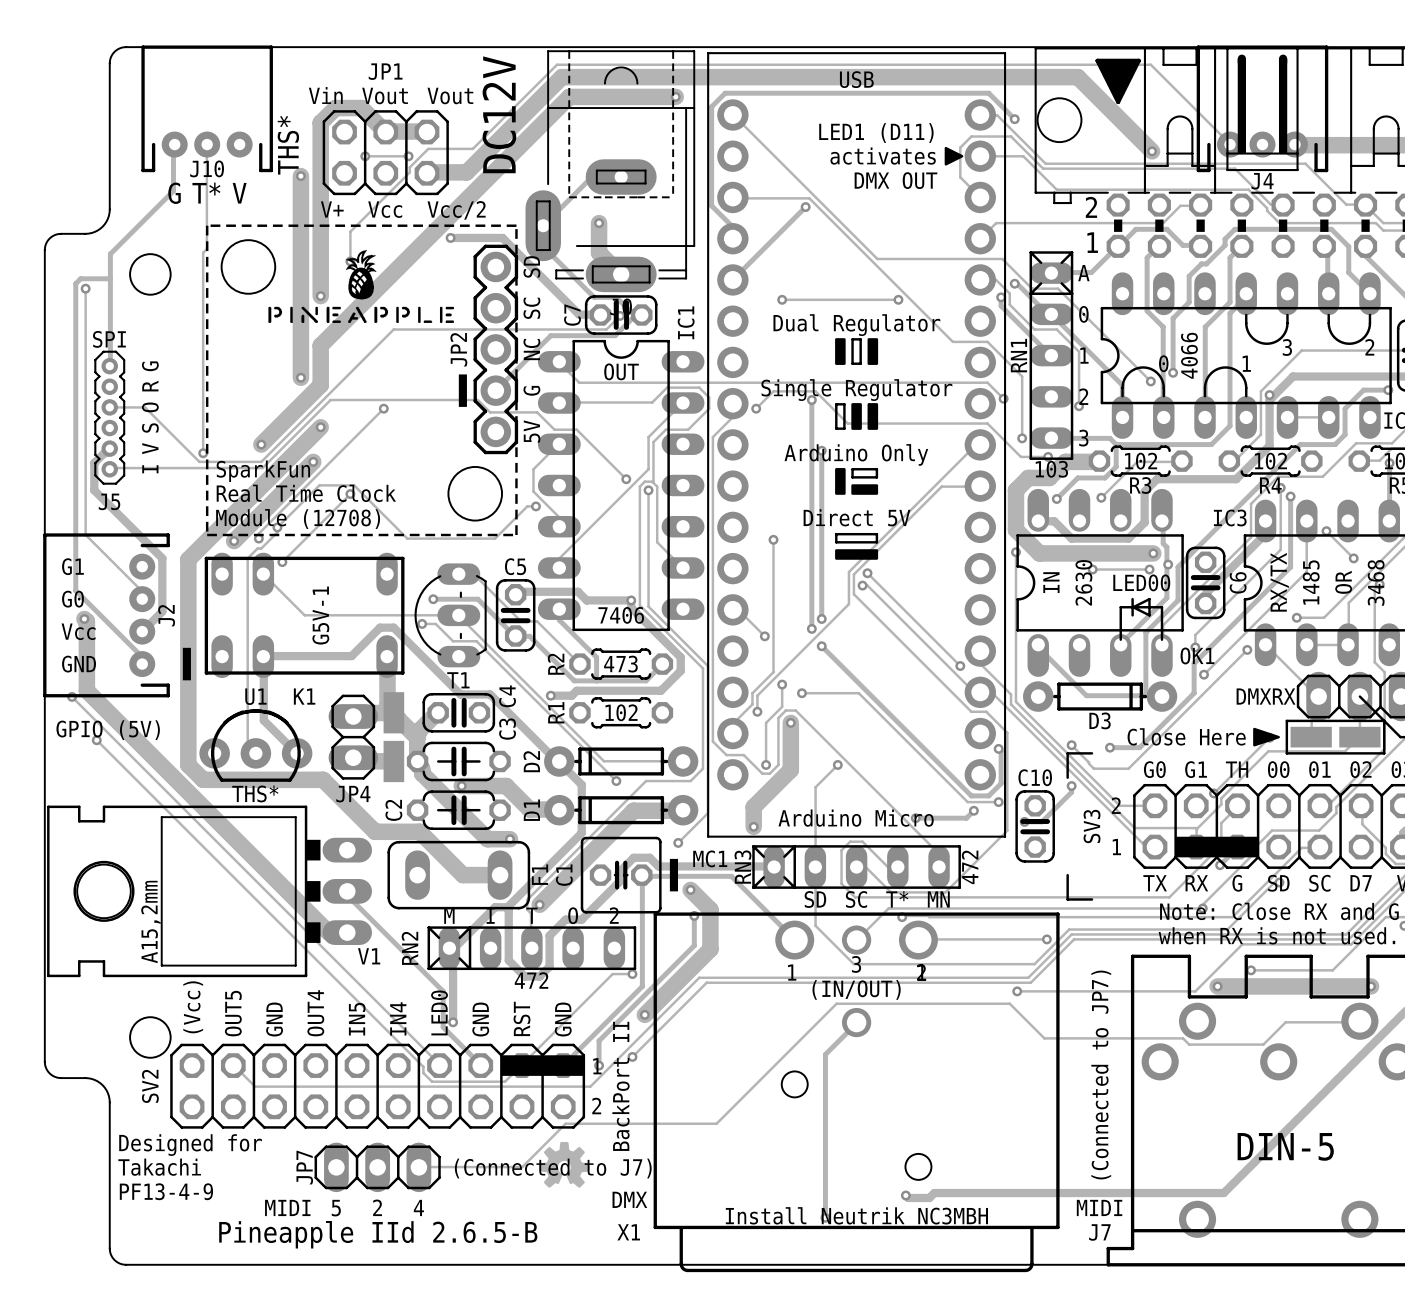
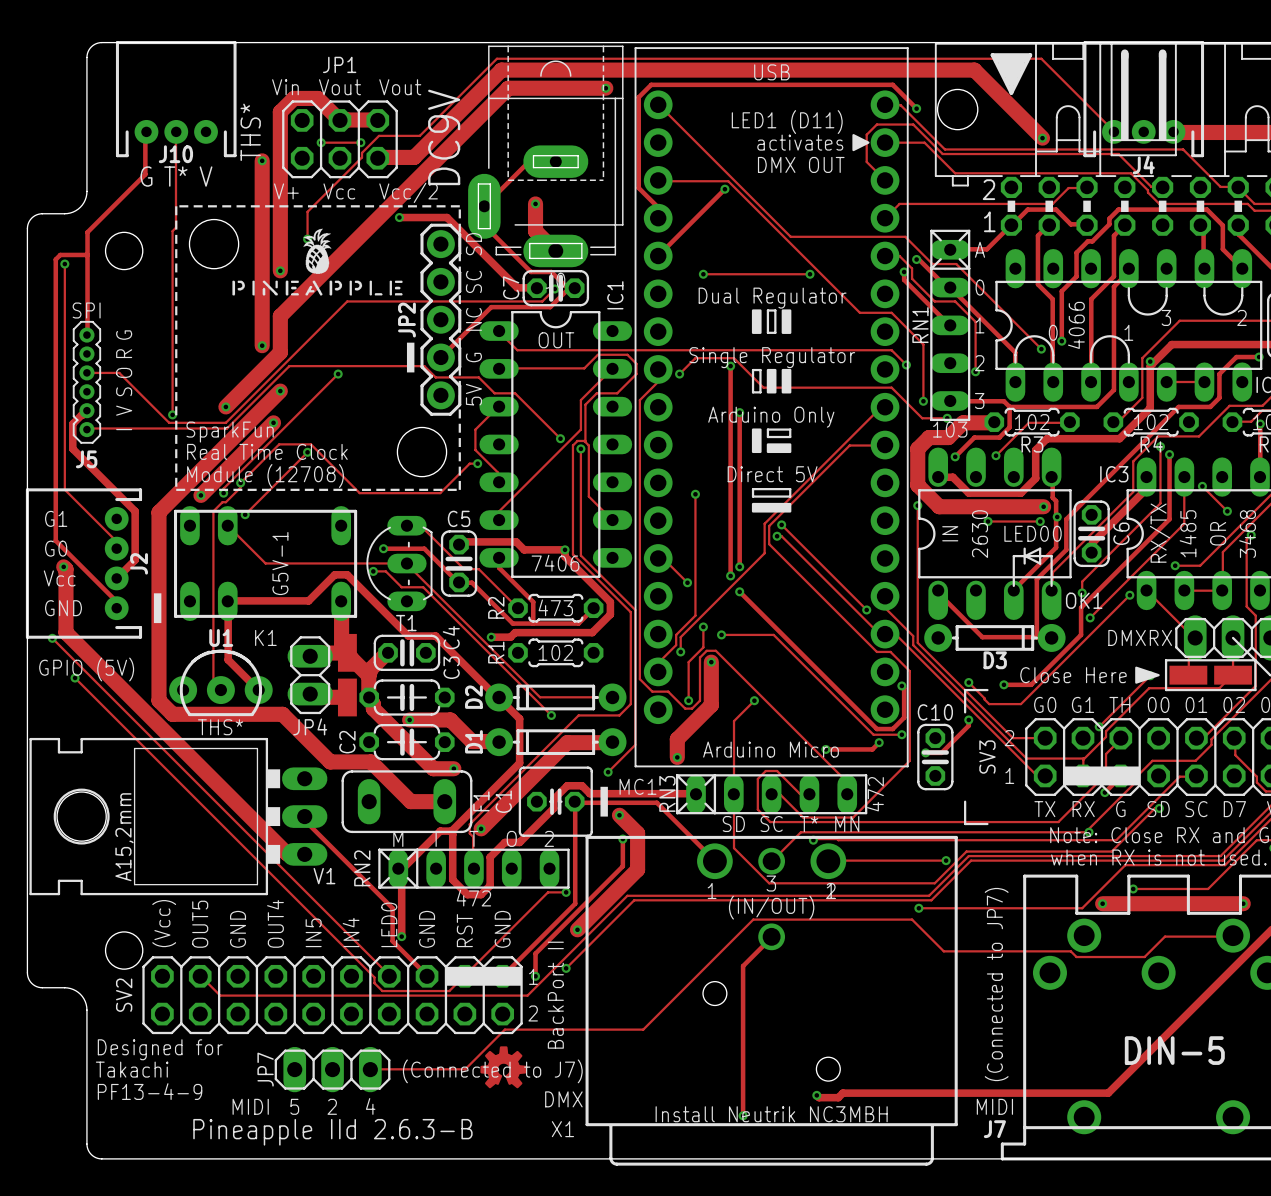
text: DC12V (499, 114) -> DC9V (444, 137)
text: Pineapple IId 2.6.5-B (378, 1234) -> Pineapple IId 2.6.3-B (332, 1132)

